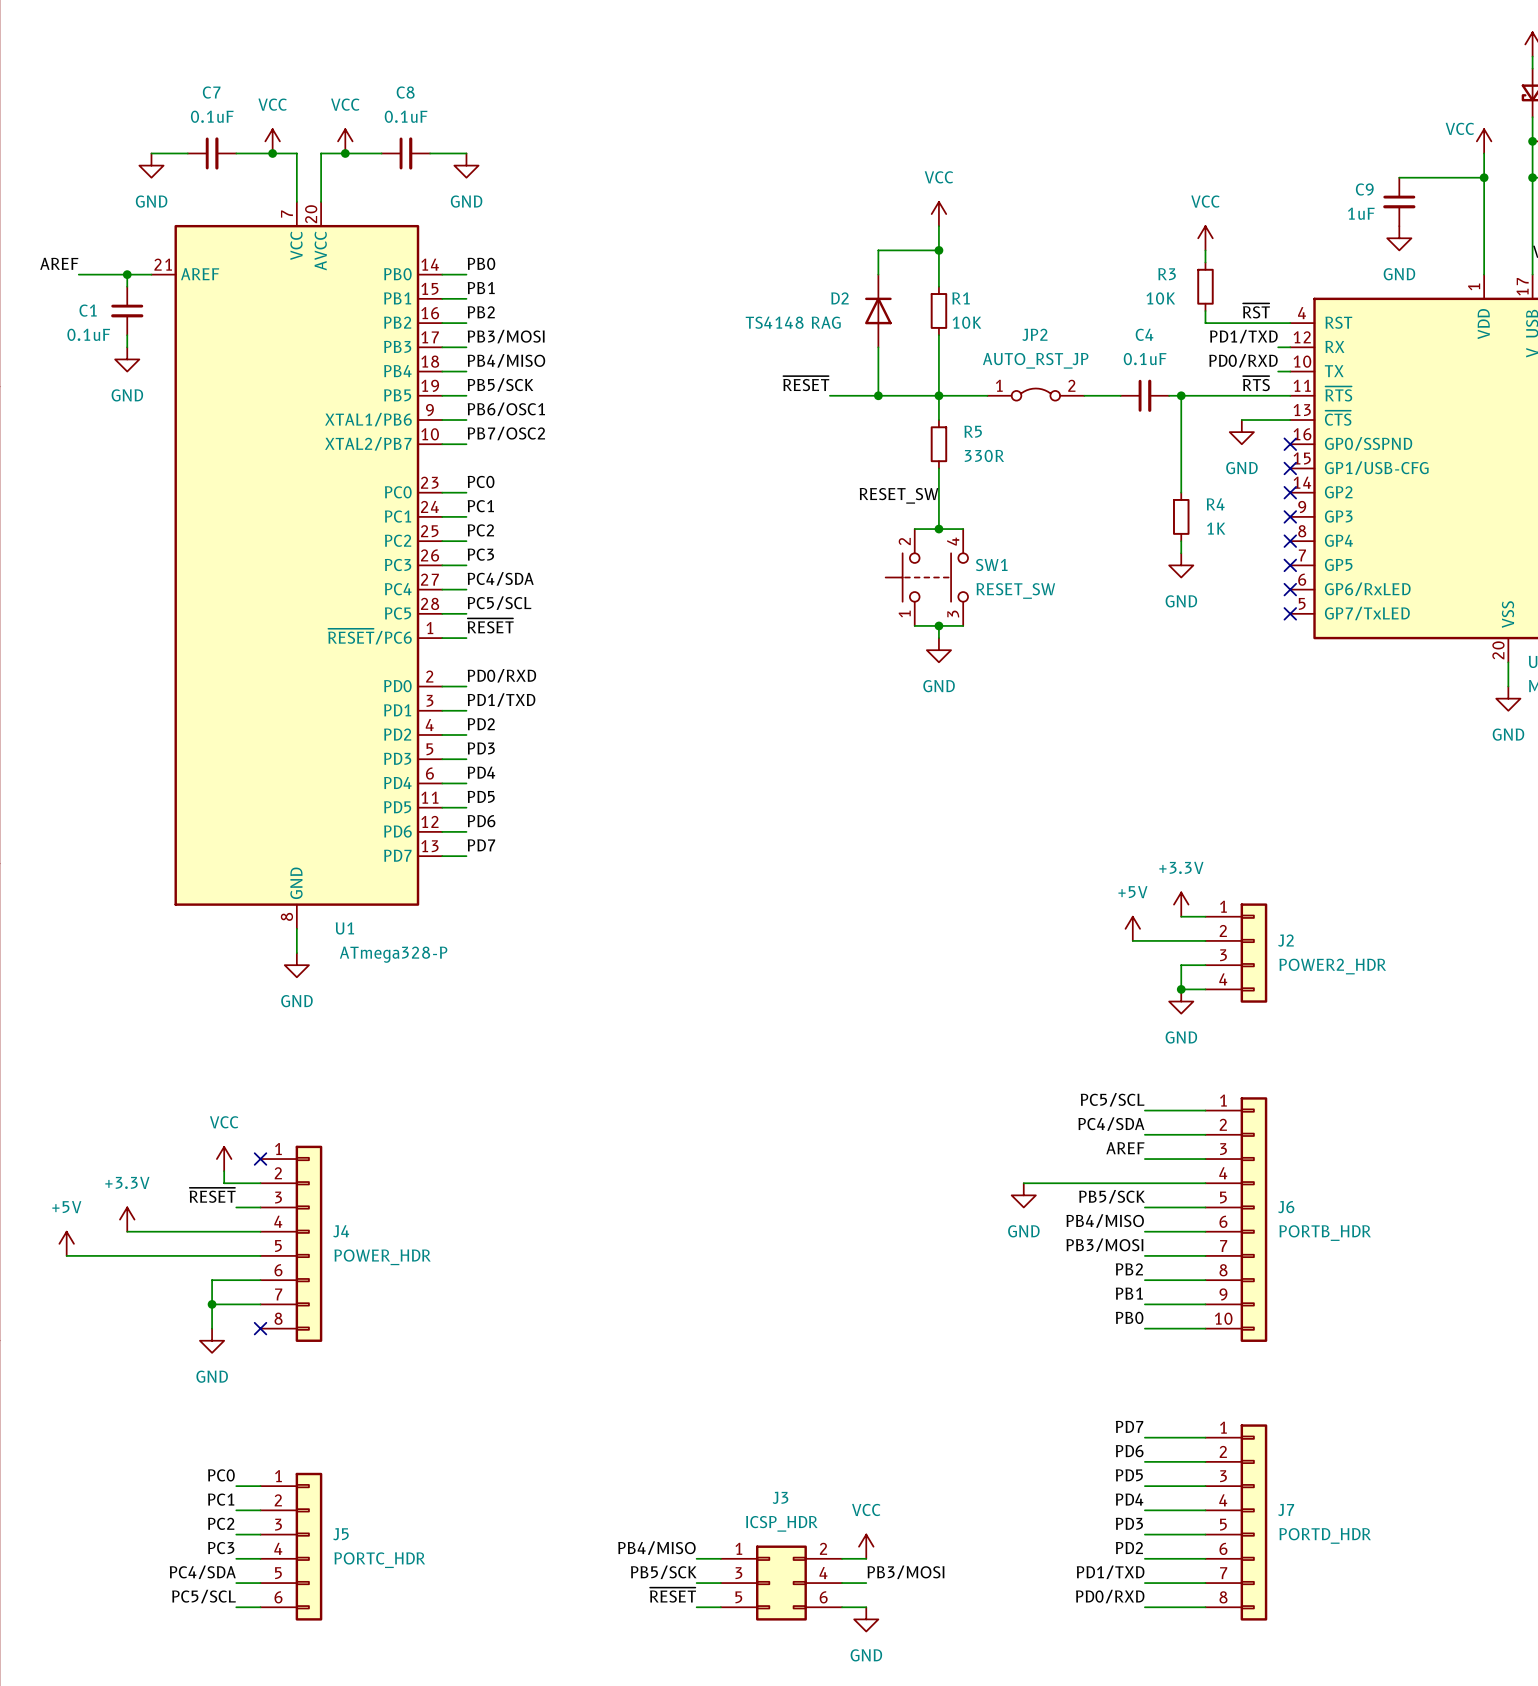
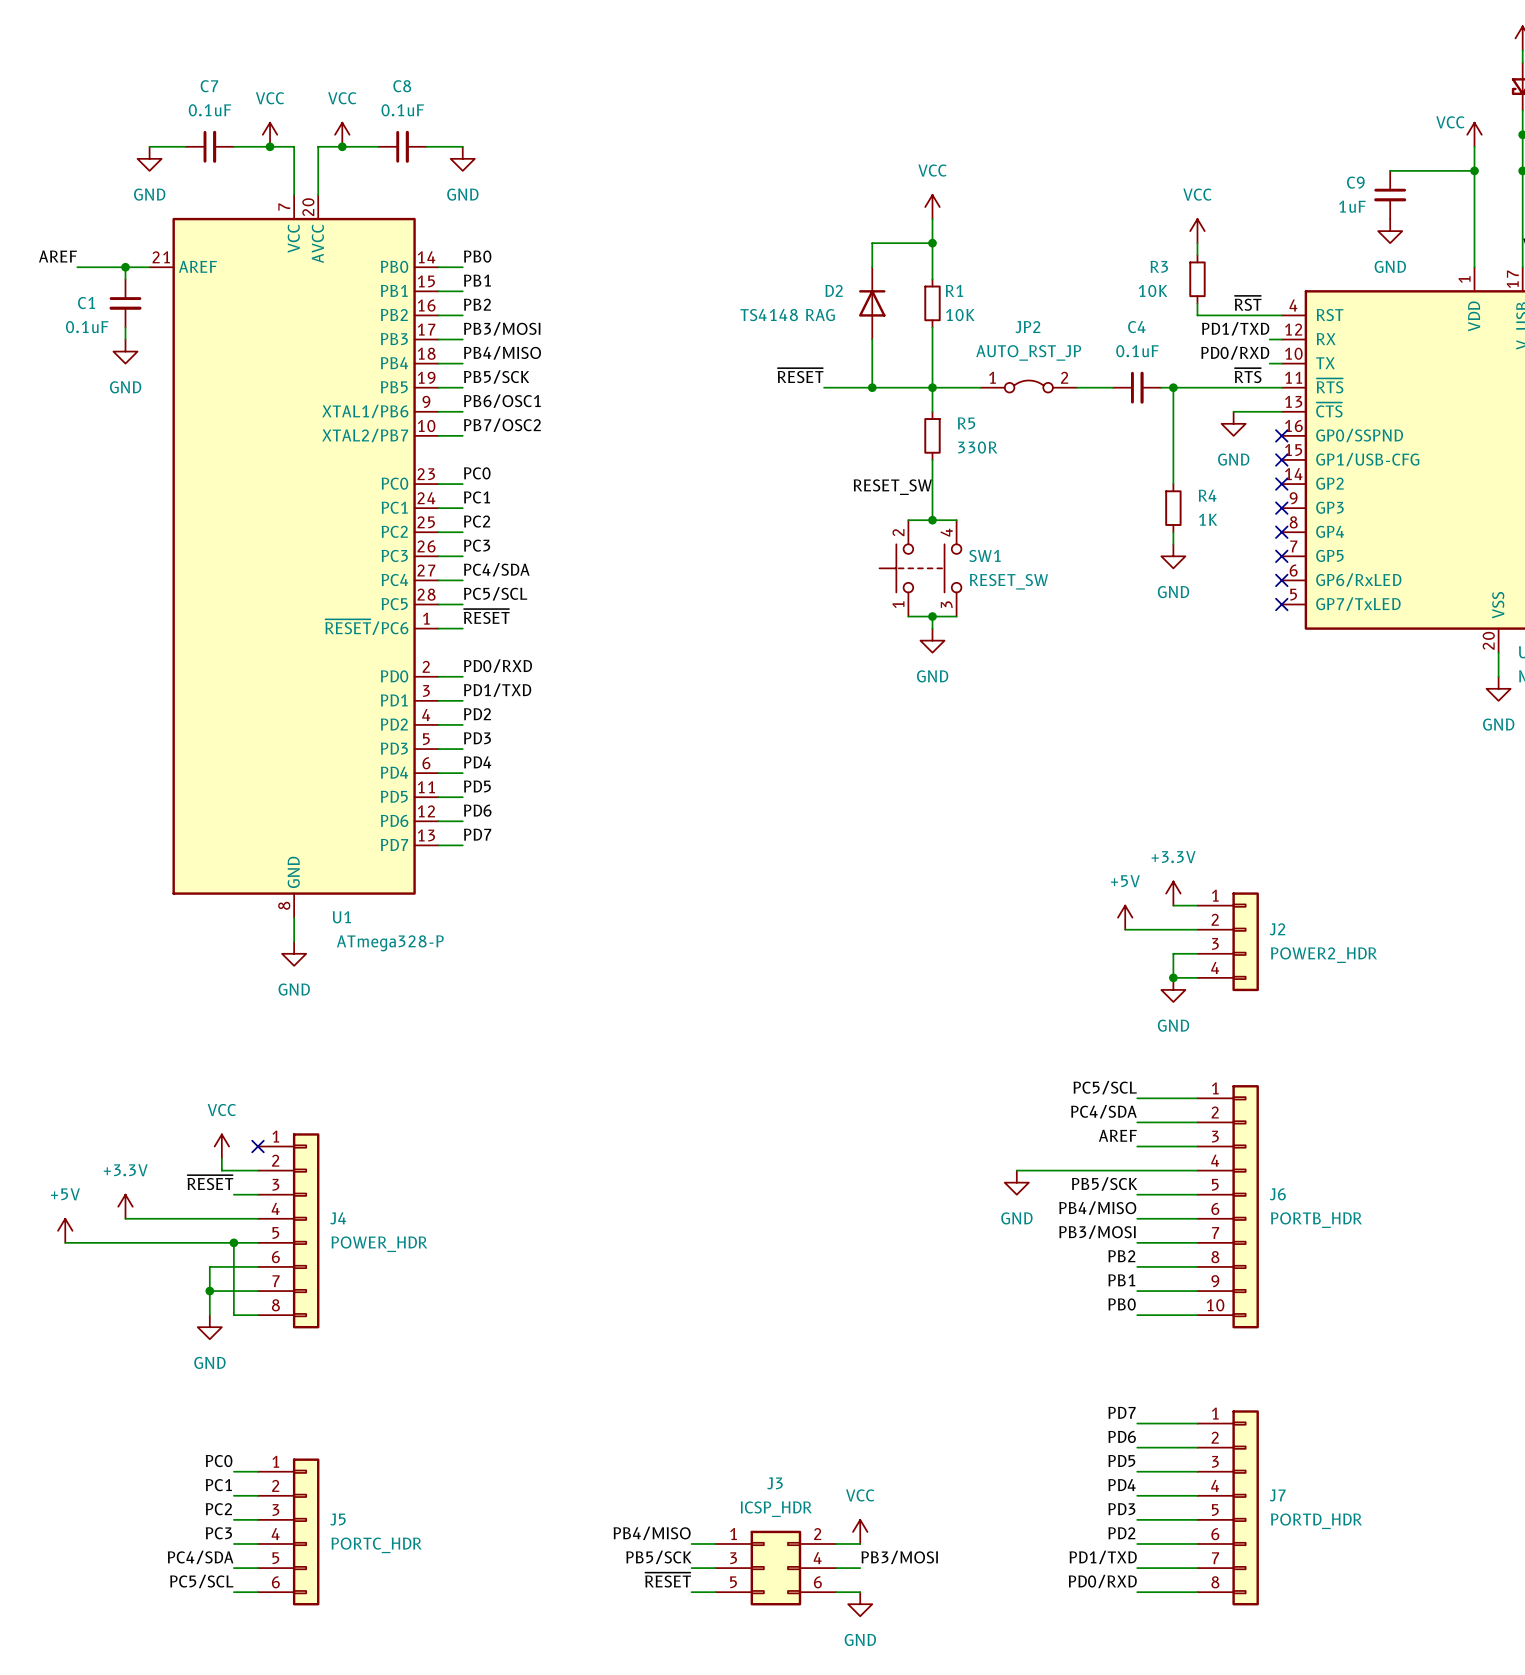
wire: none -> (233, 1242) (233, 1315) (257, 1315)
junction: none -> (233, 1242)
no-connect mark: (260, 1328) -> none

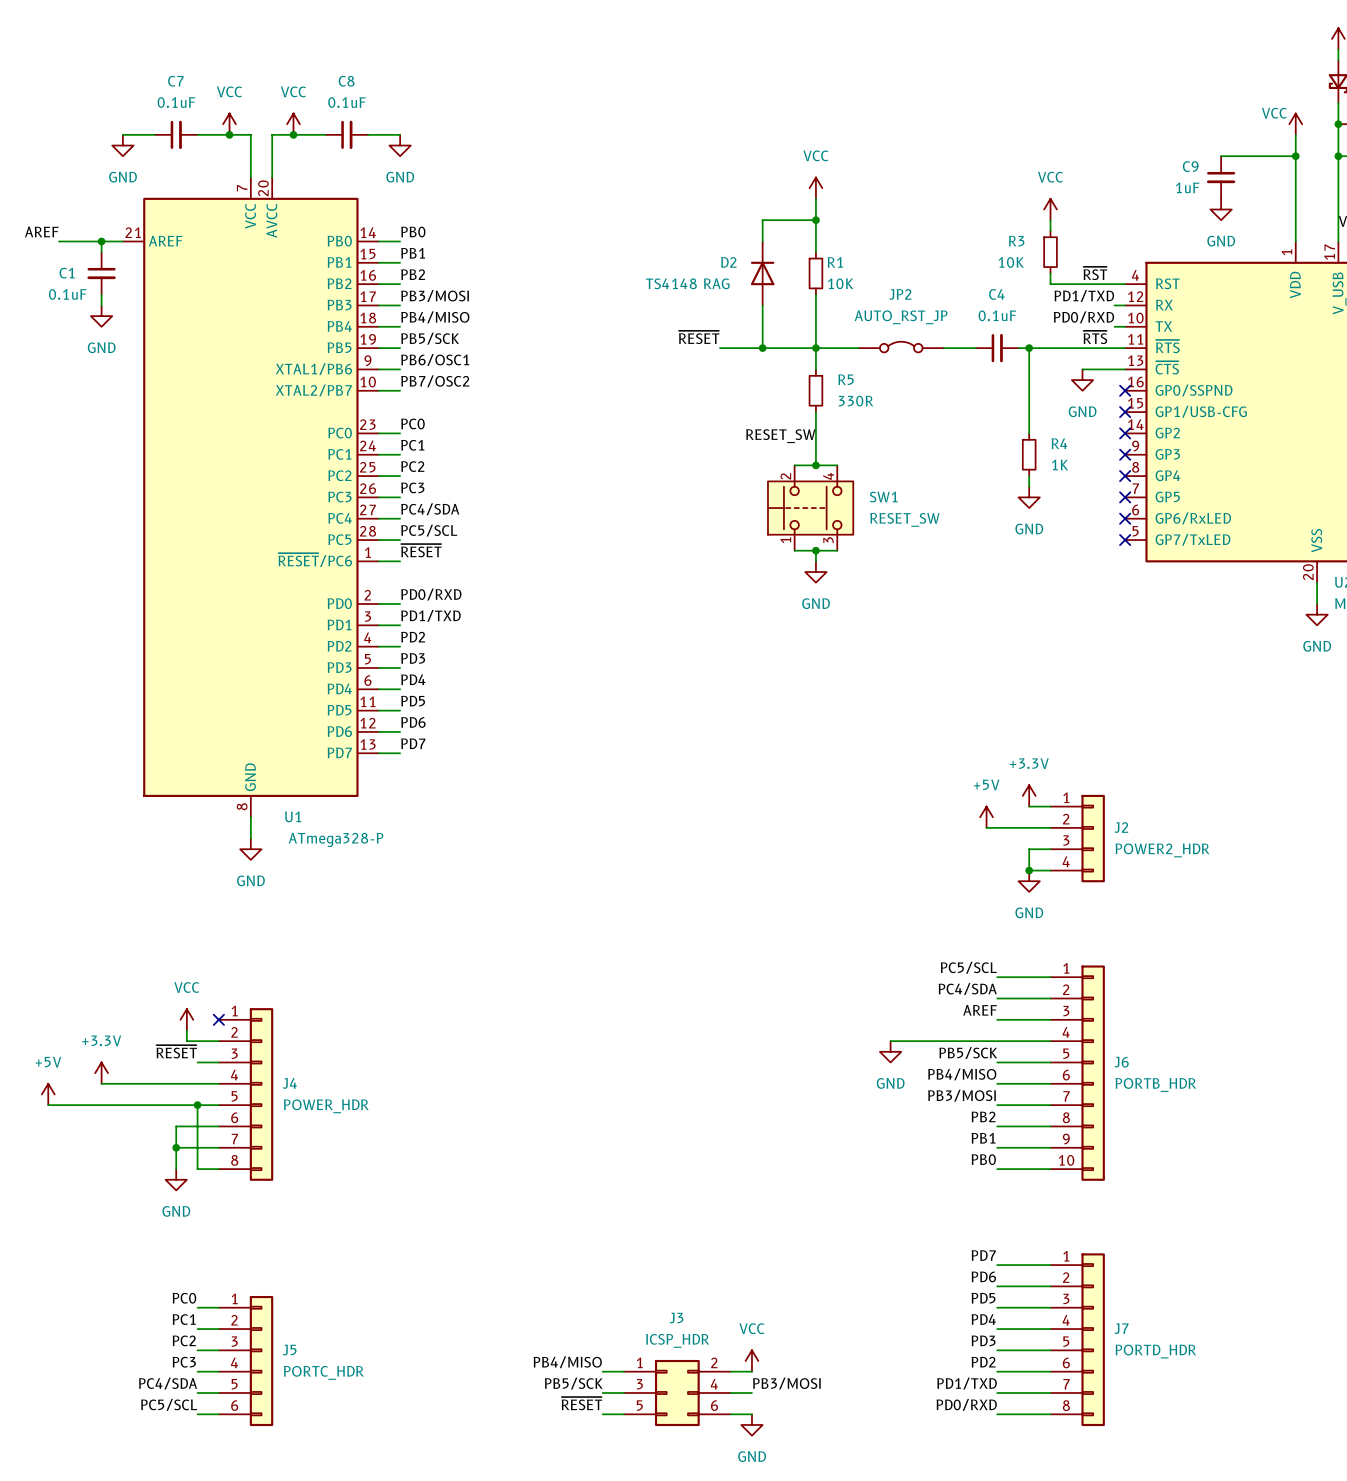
JP2 pin number: 1 (992, 377) -> none
JP2 pin number: 2 (1064, 377) -> none
SW1 symbol: [879, 520, 962, 617] -> [767, 465, 854, 551]

